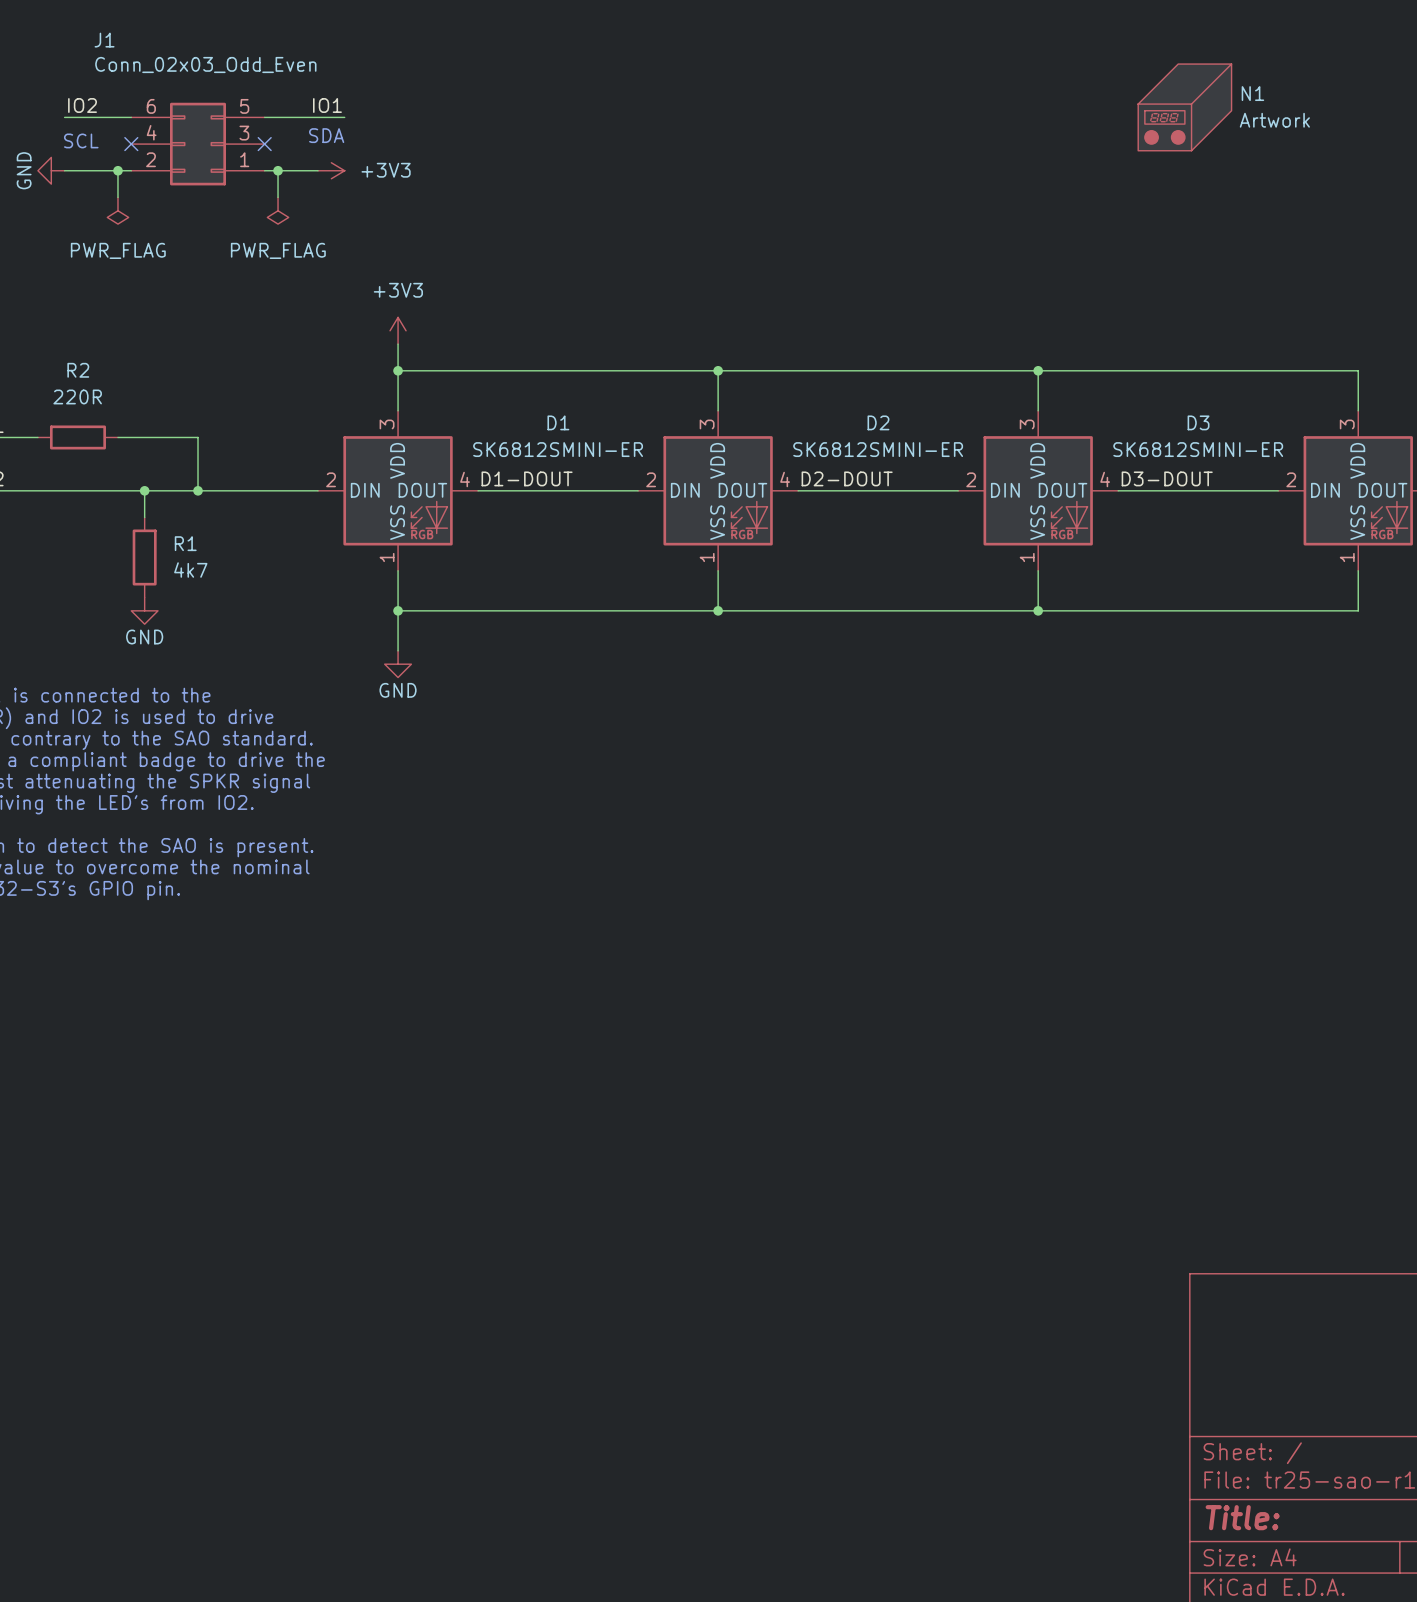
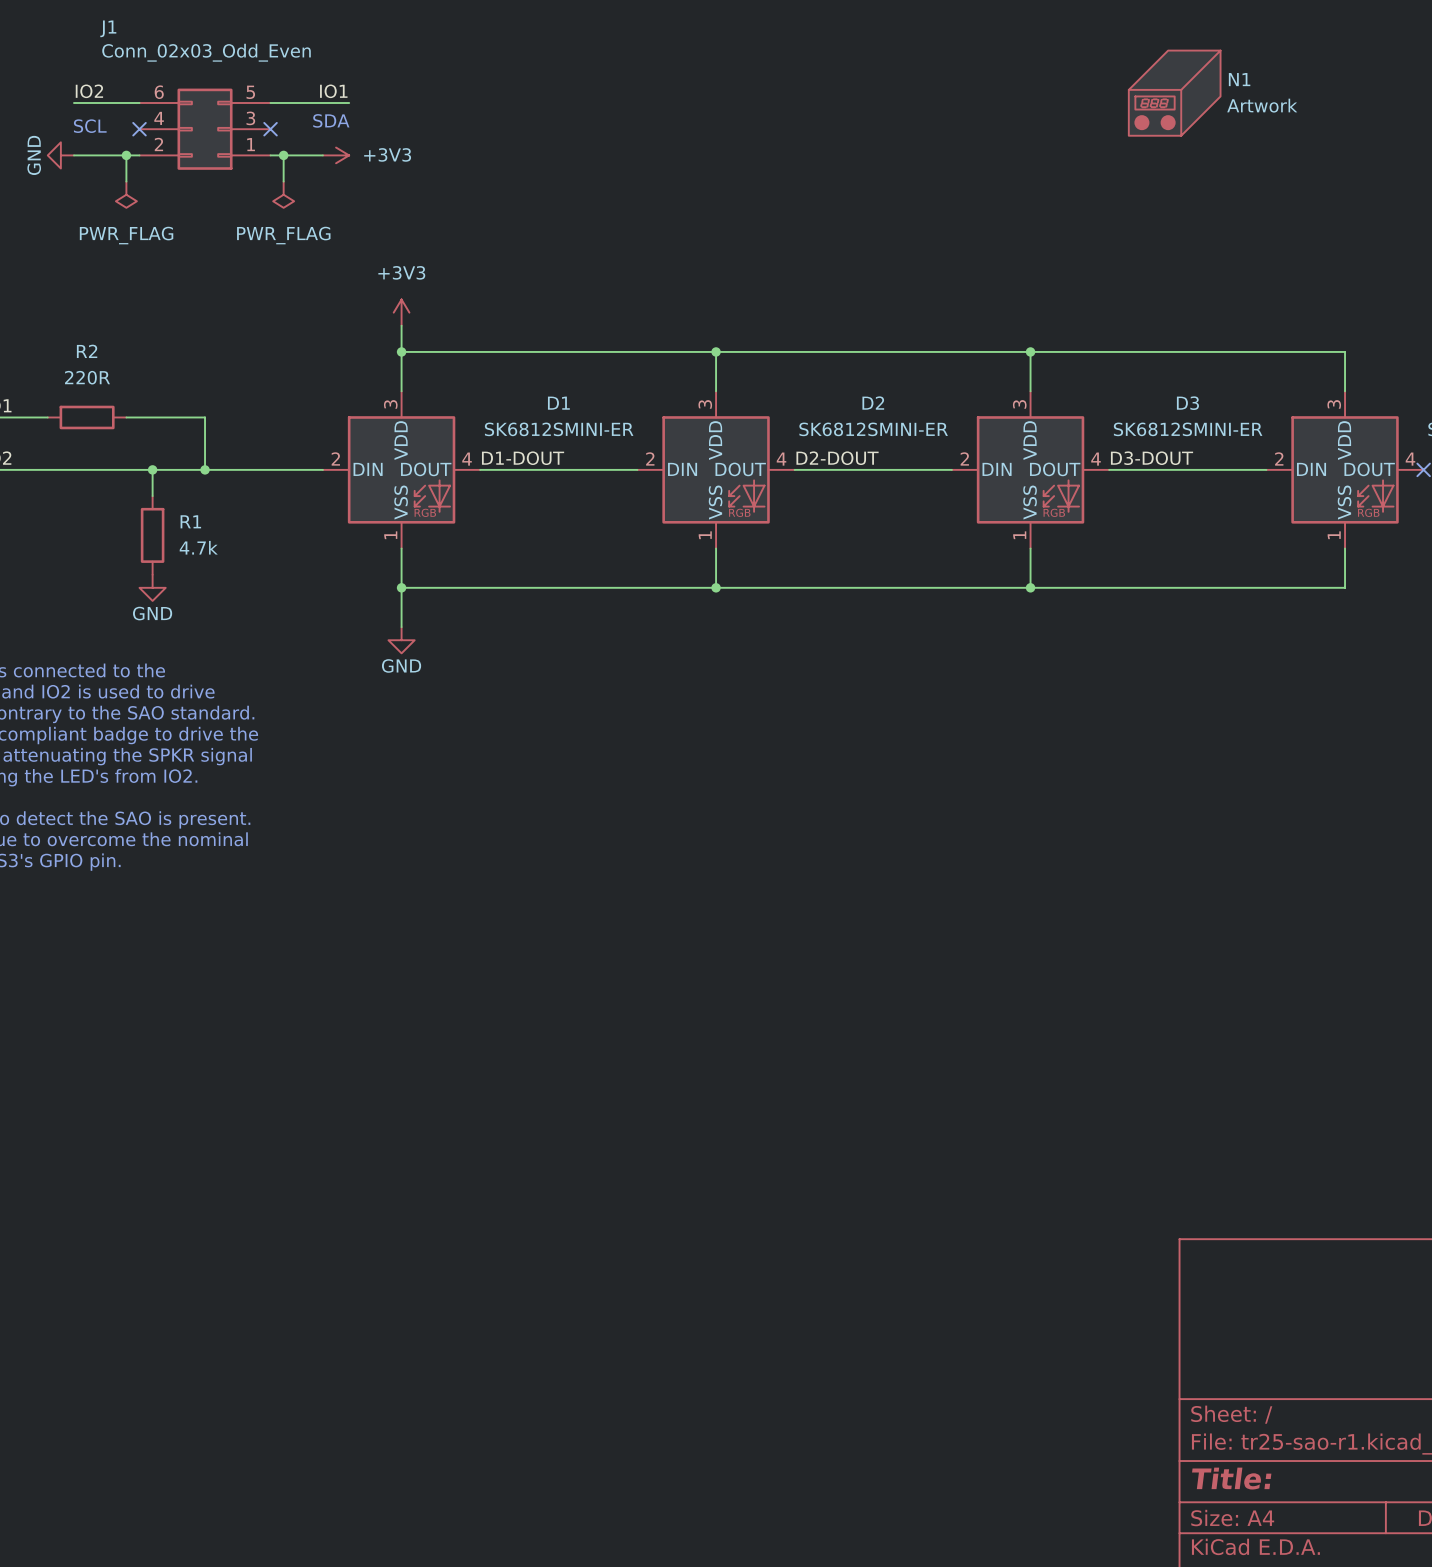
R1 value: 4k7 (190, 570) -> 4.7k (198, 547)

